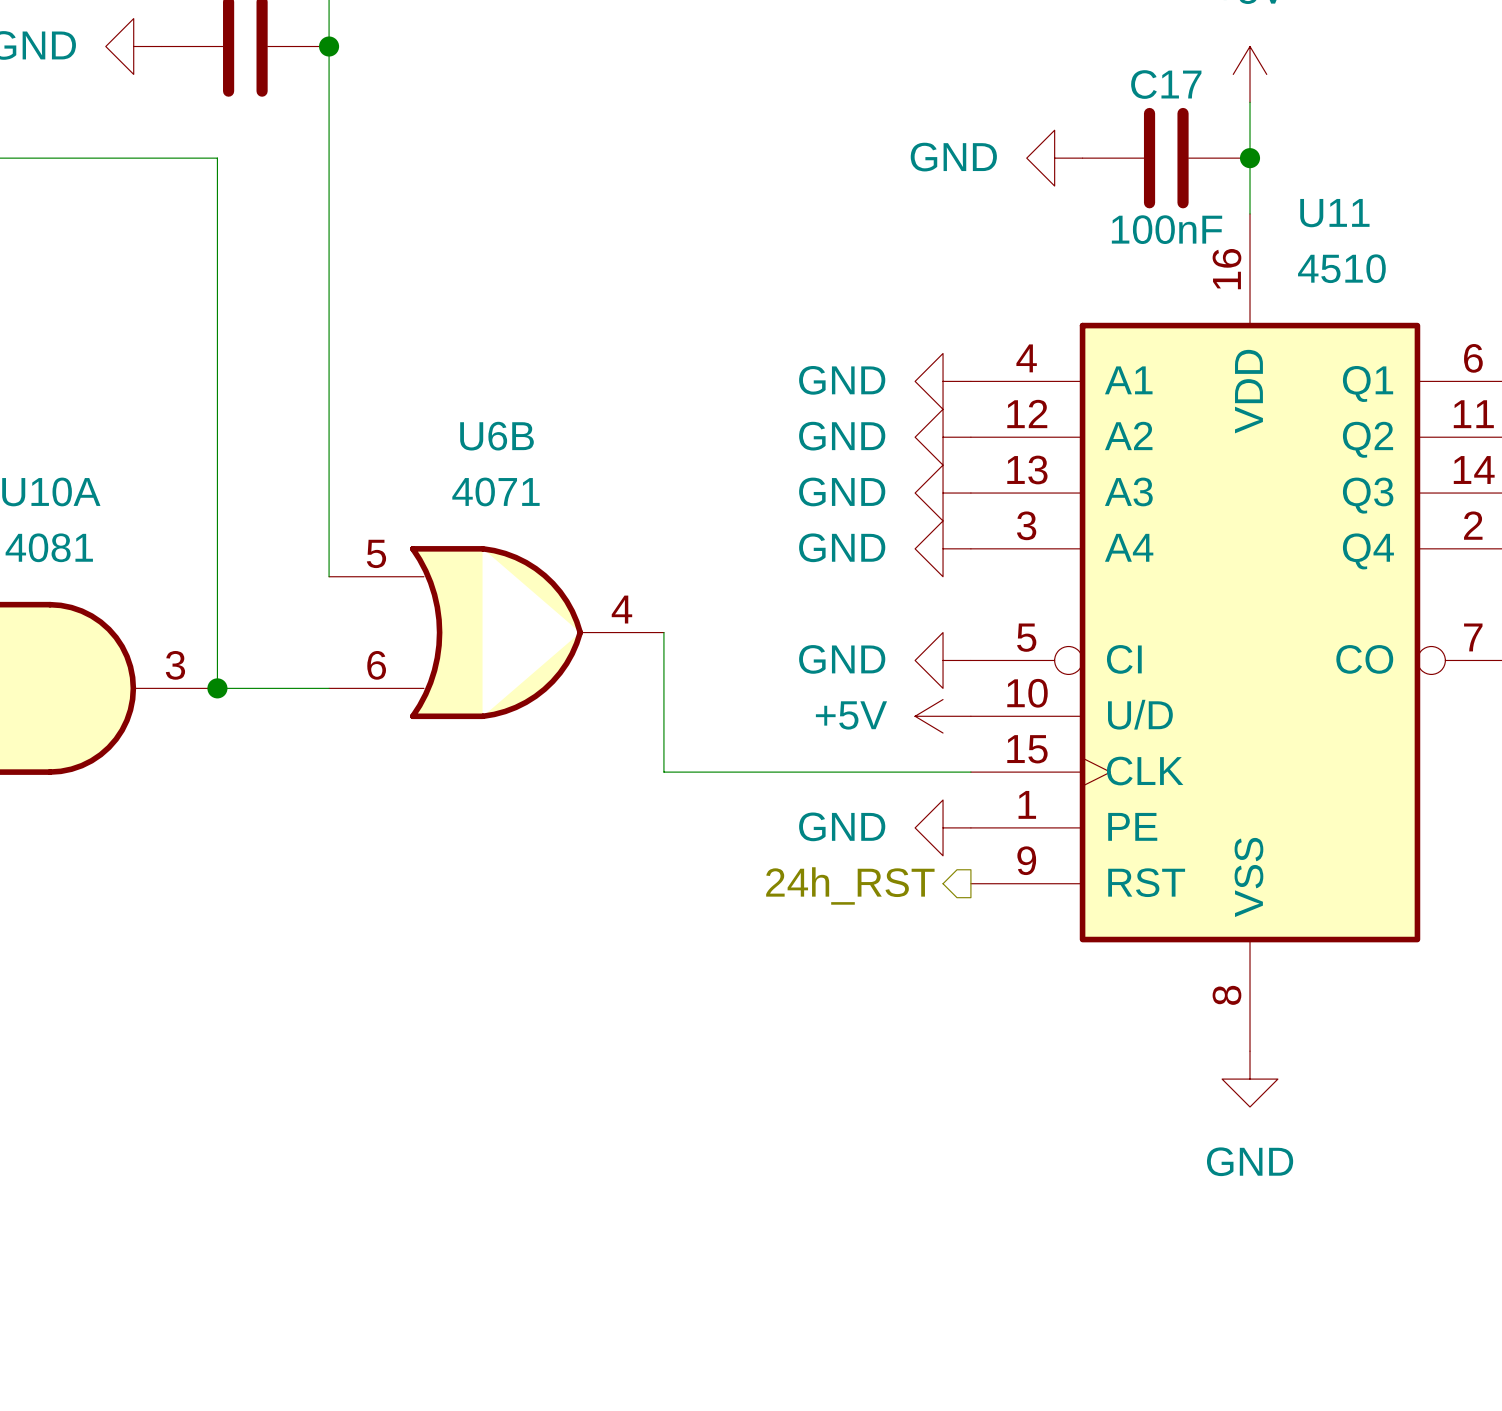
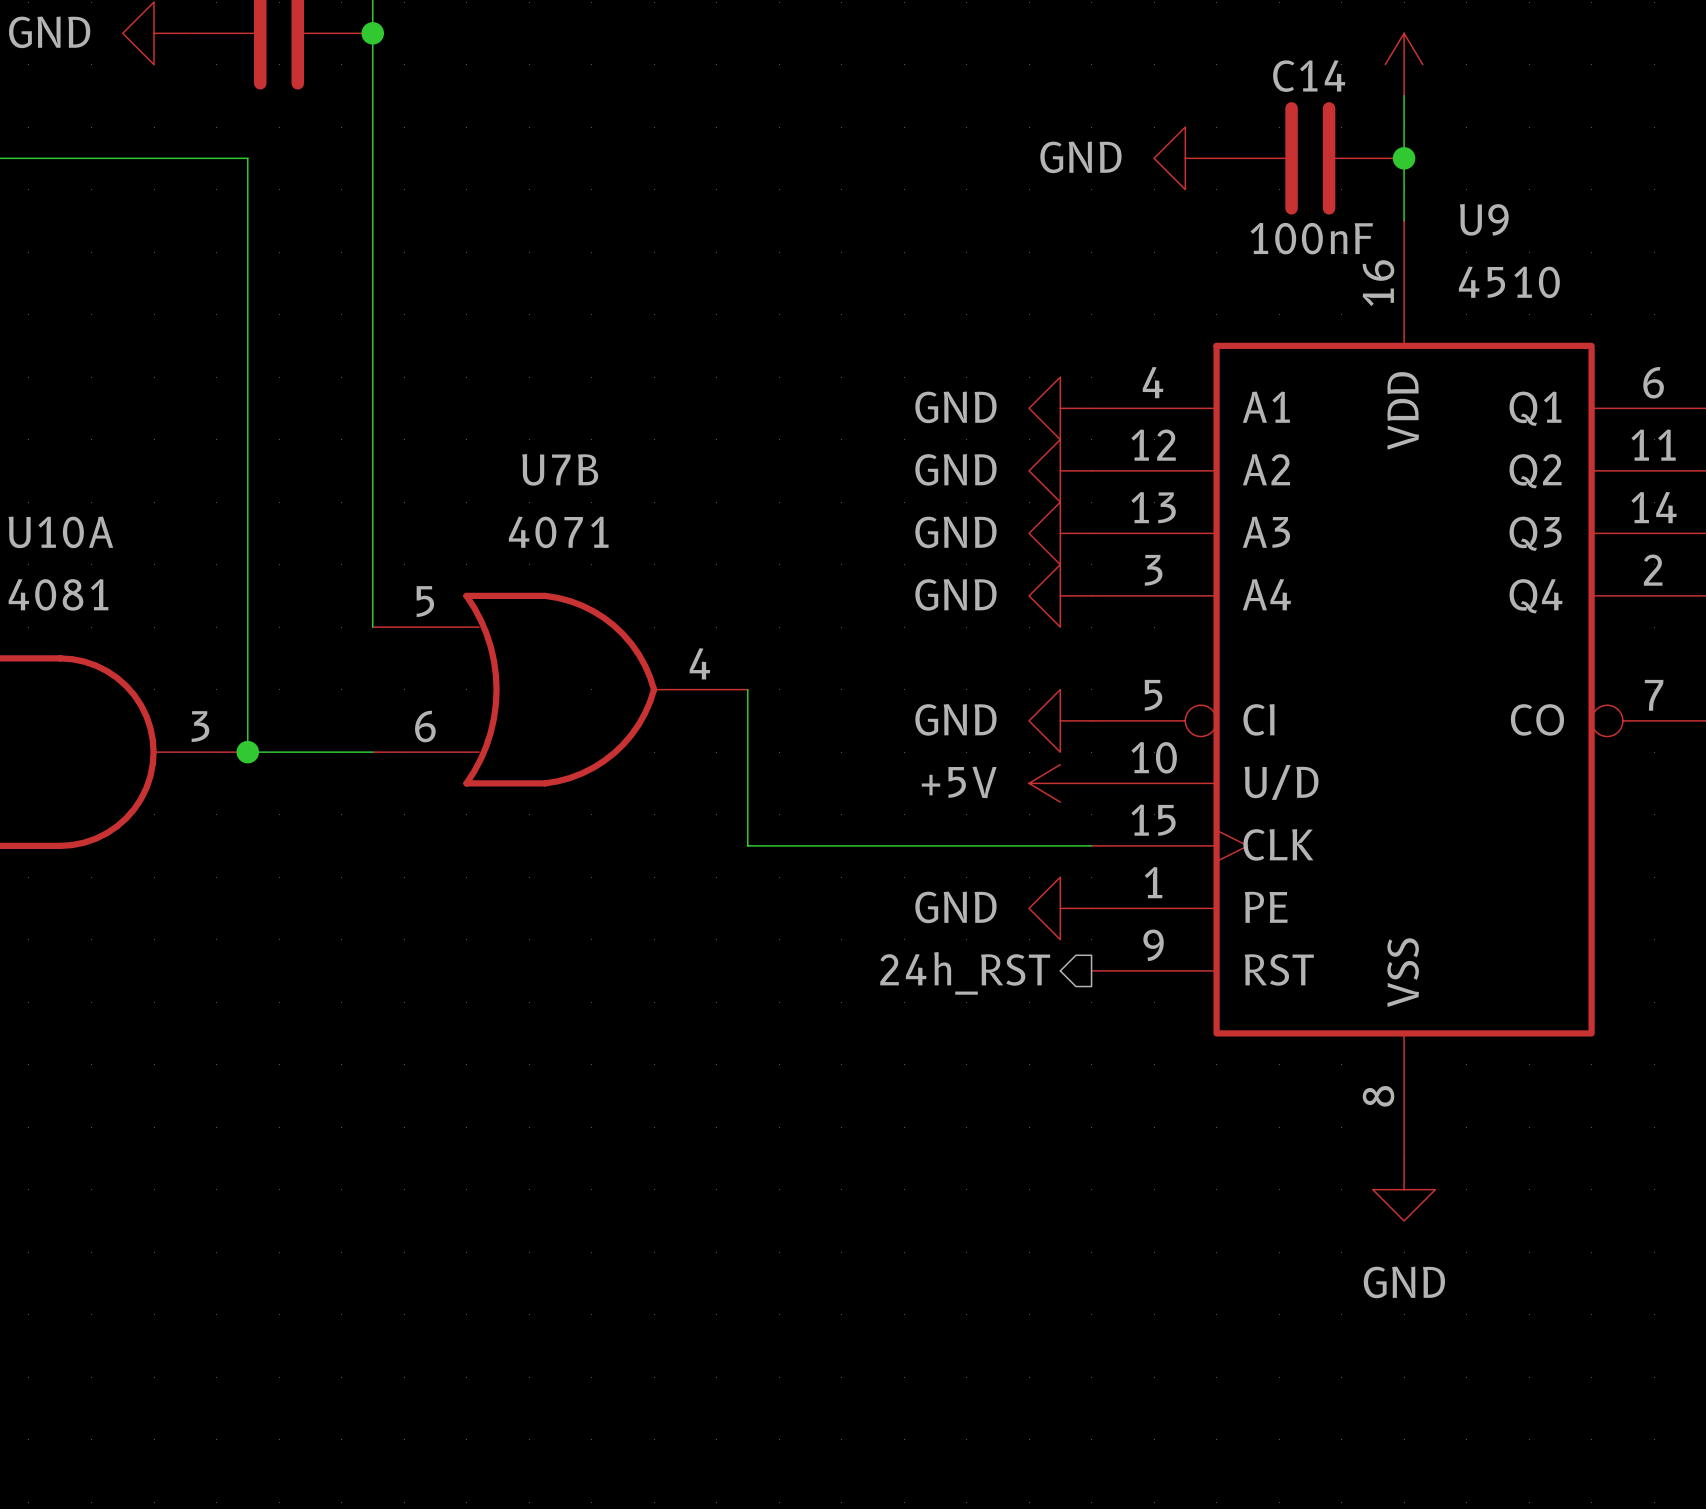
C17 name: C17 (1166, 84) -> C14 (1309, 76)
U11 name: U11 (1334, 213) -> U9 (1484, 219)
U6B name: U6B (497, 436) -> U7B (560, 469)

